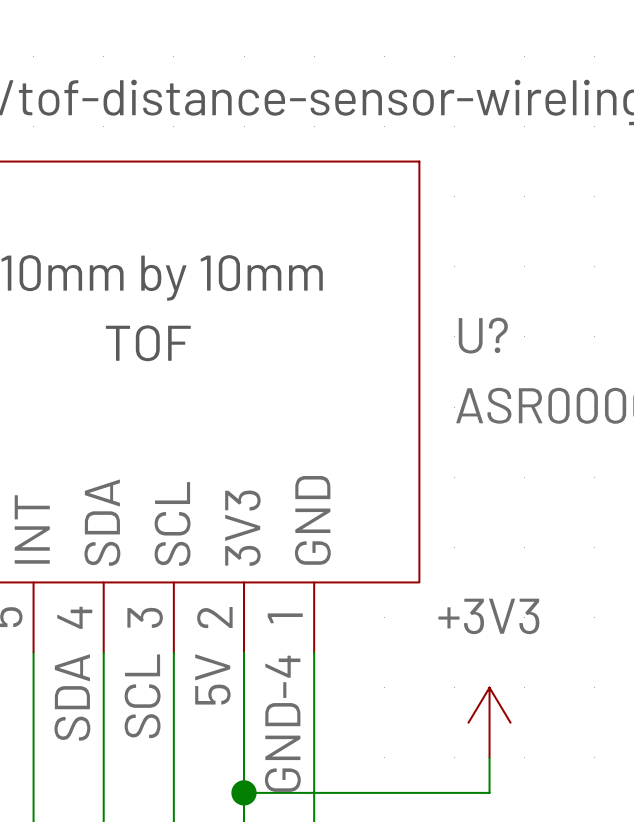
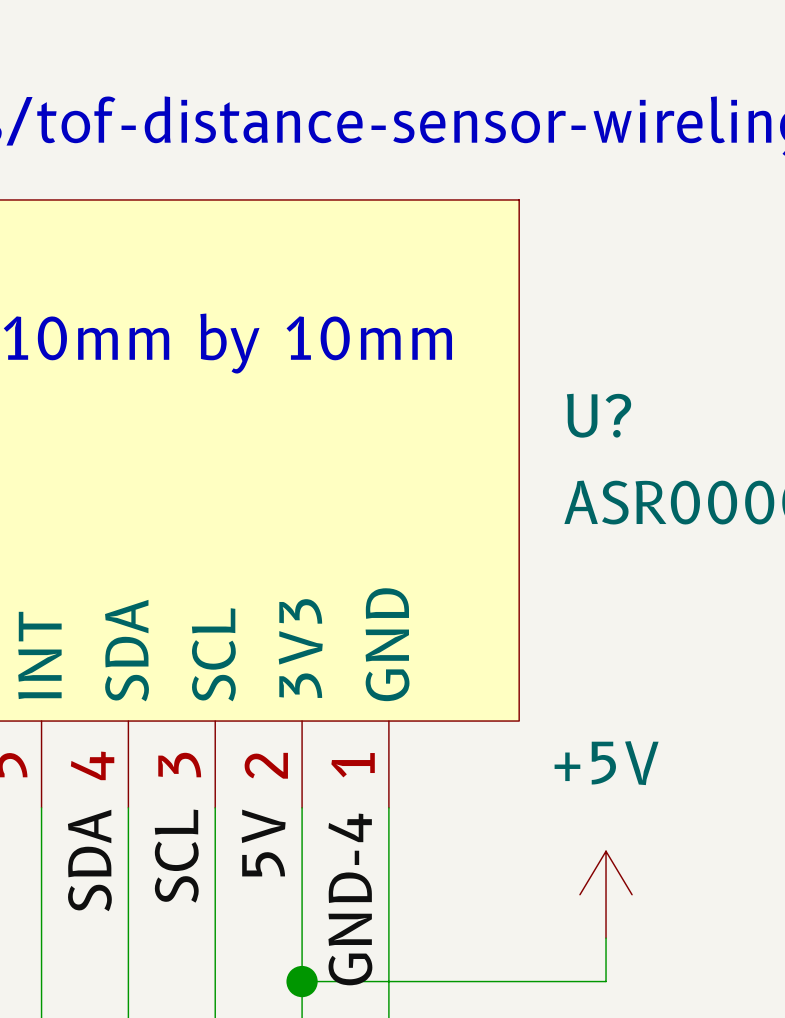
text: TOF (148, 343) -> none
power symbol: +3V3 (489, 722) -> +5V (606, 894)

